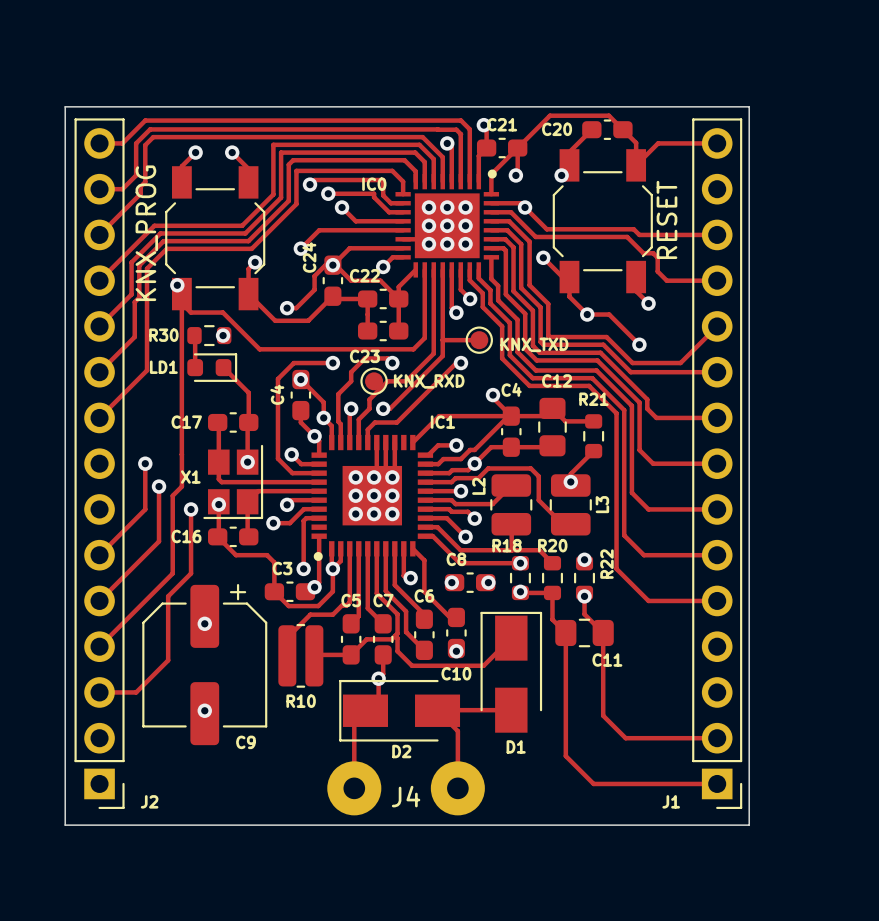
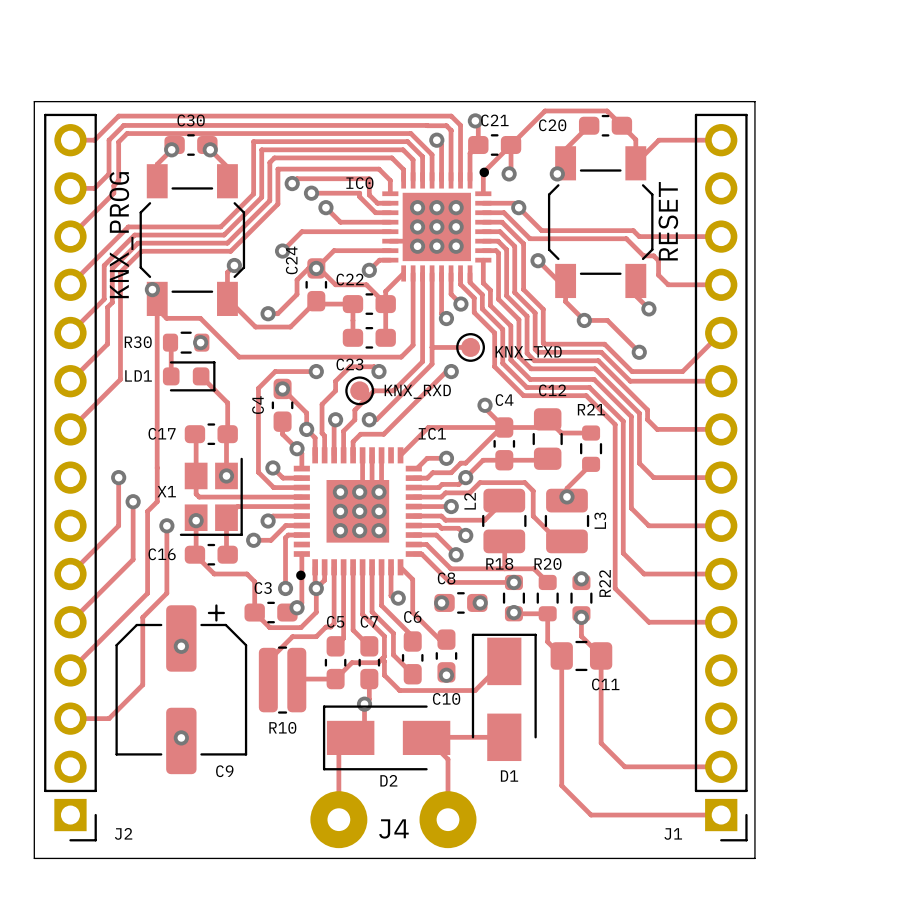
C30: none -> (190, 145)

